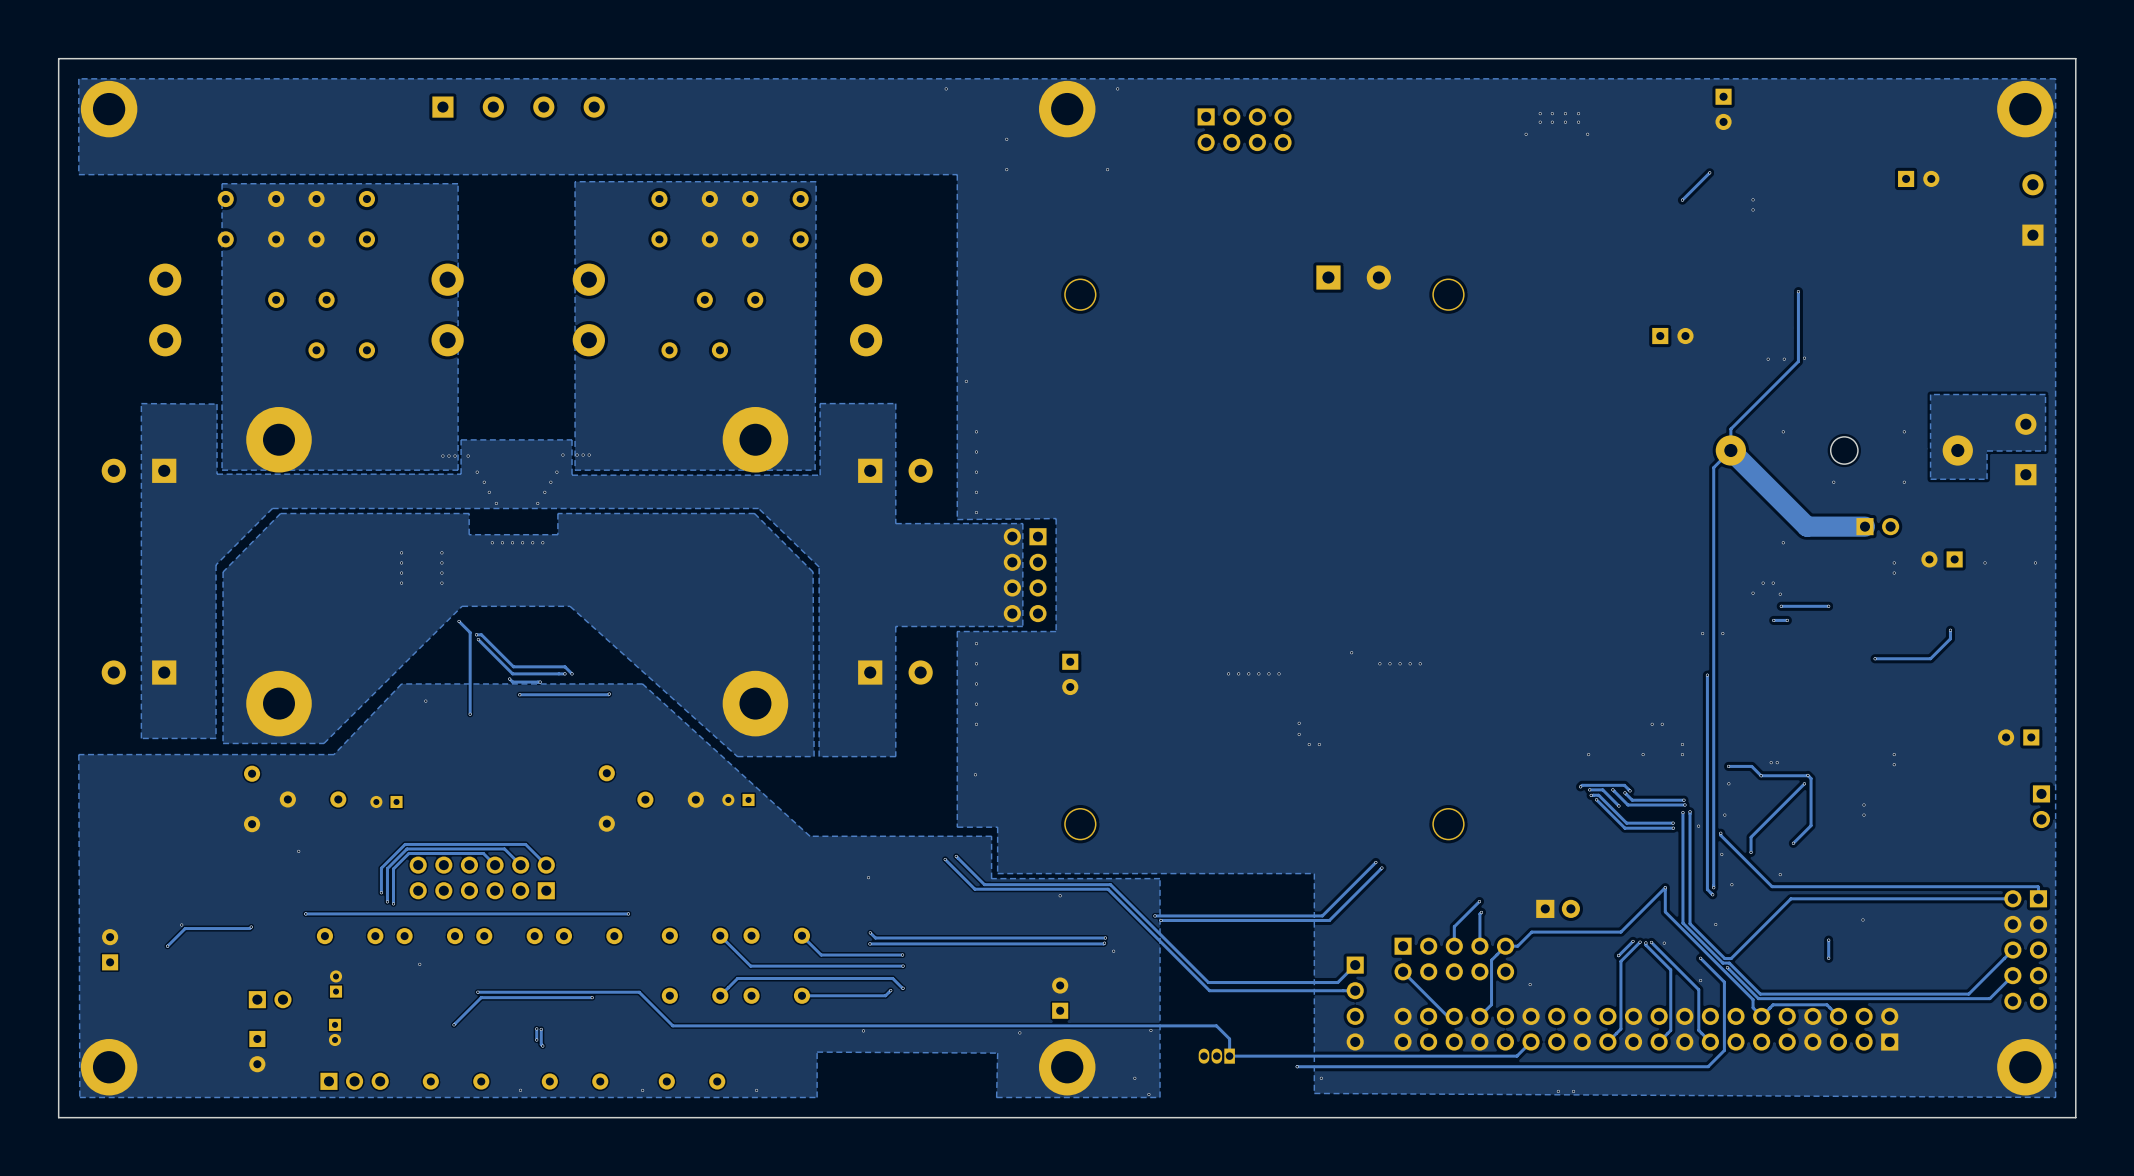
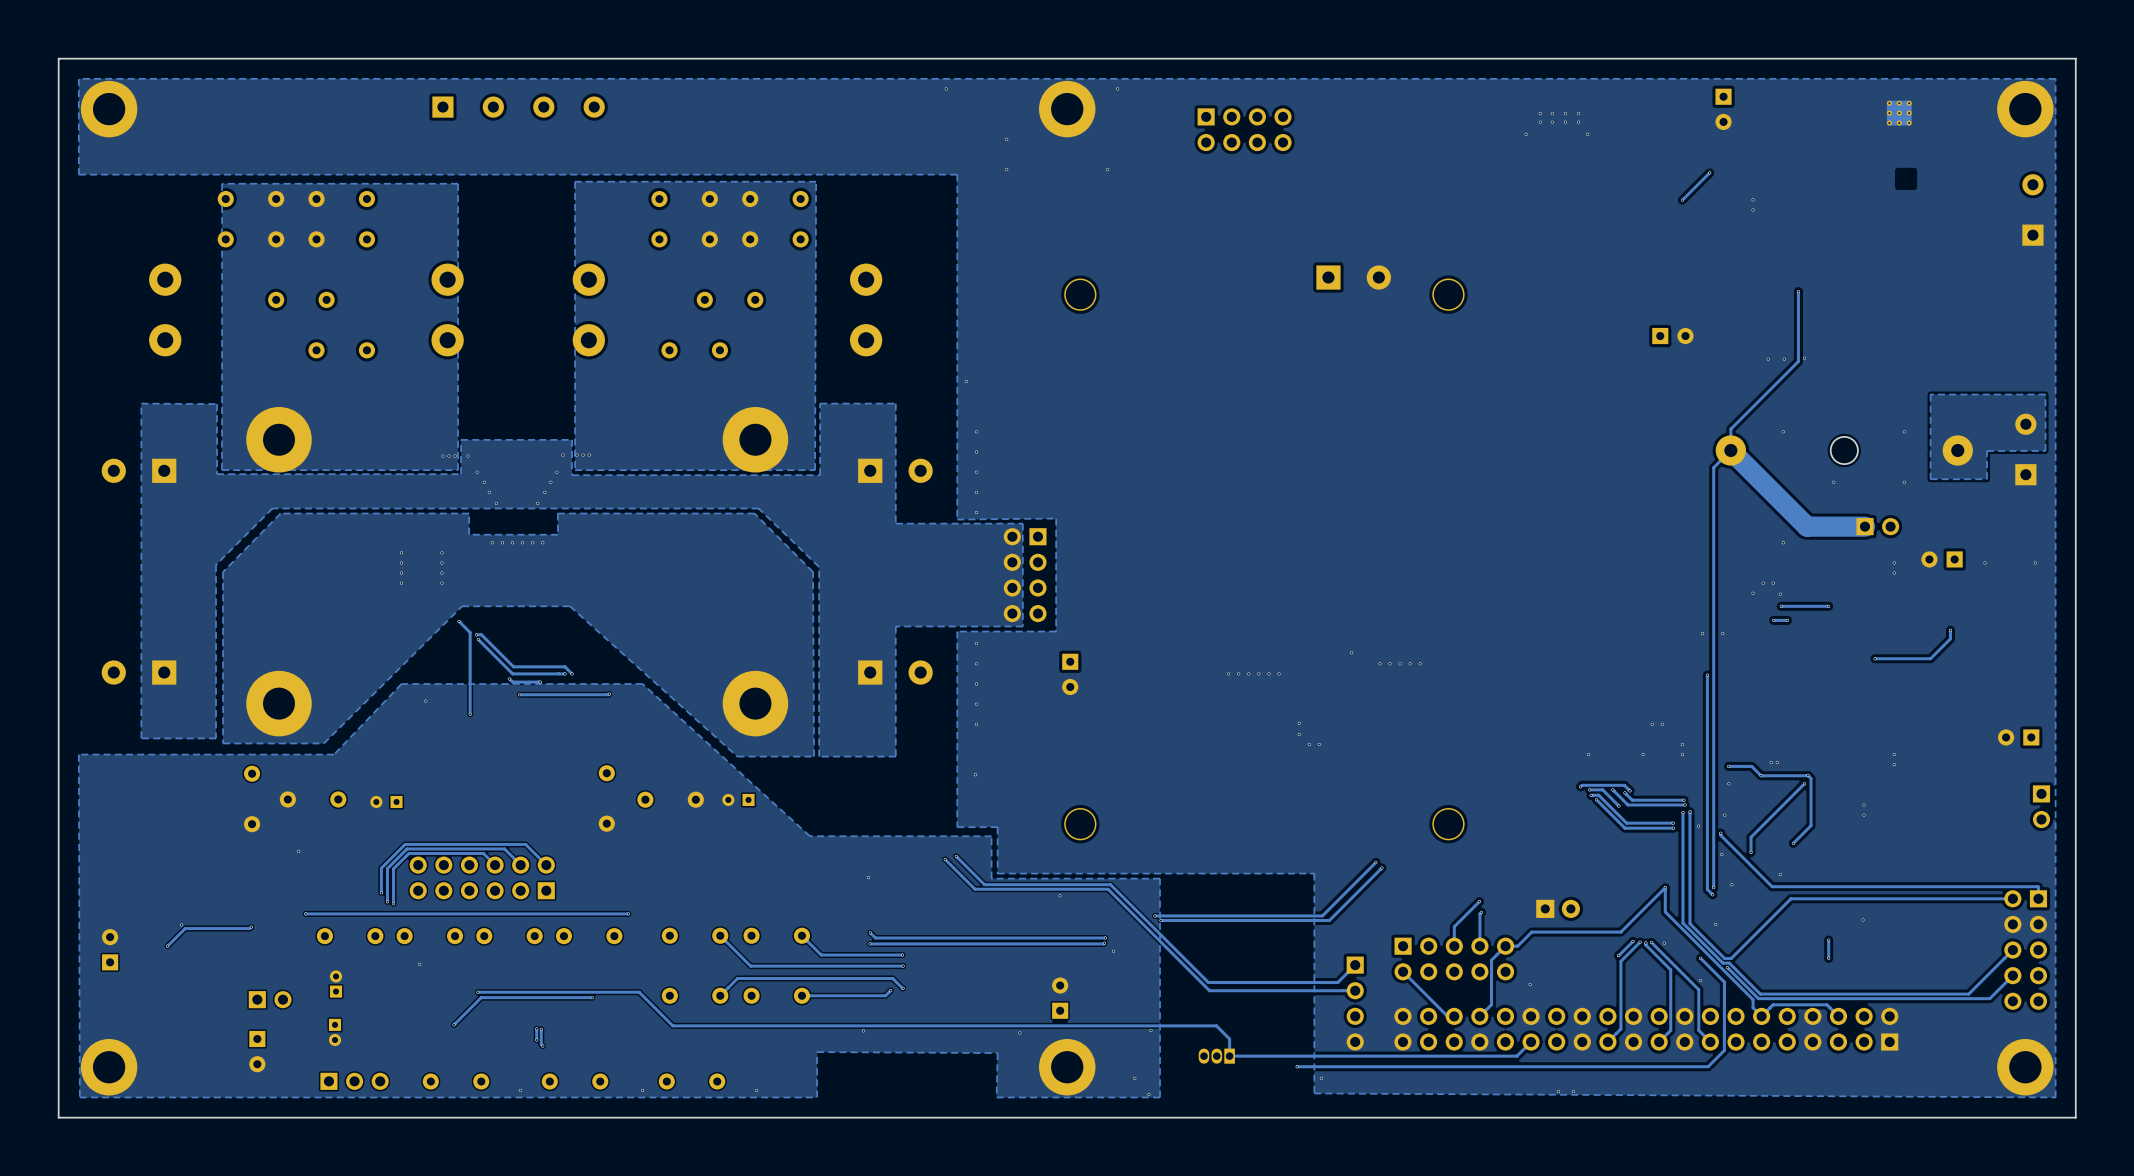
part: none -> (1899, 113)
part: (1918, 178) -> none

